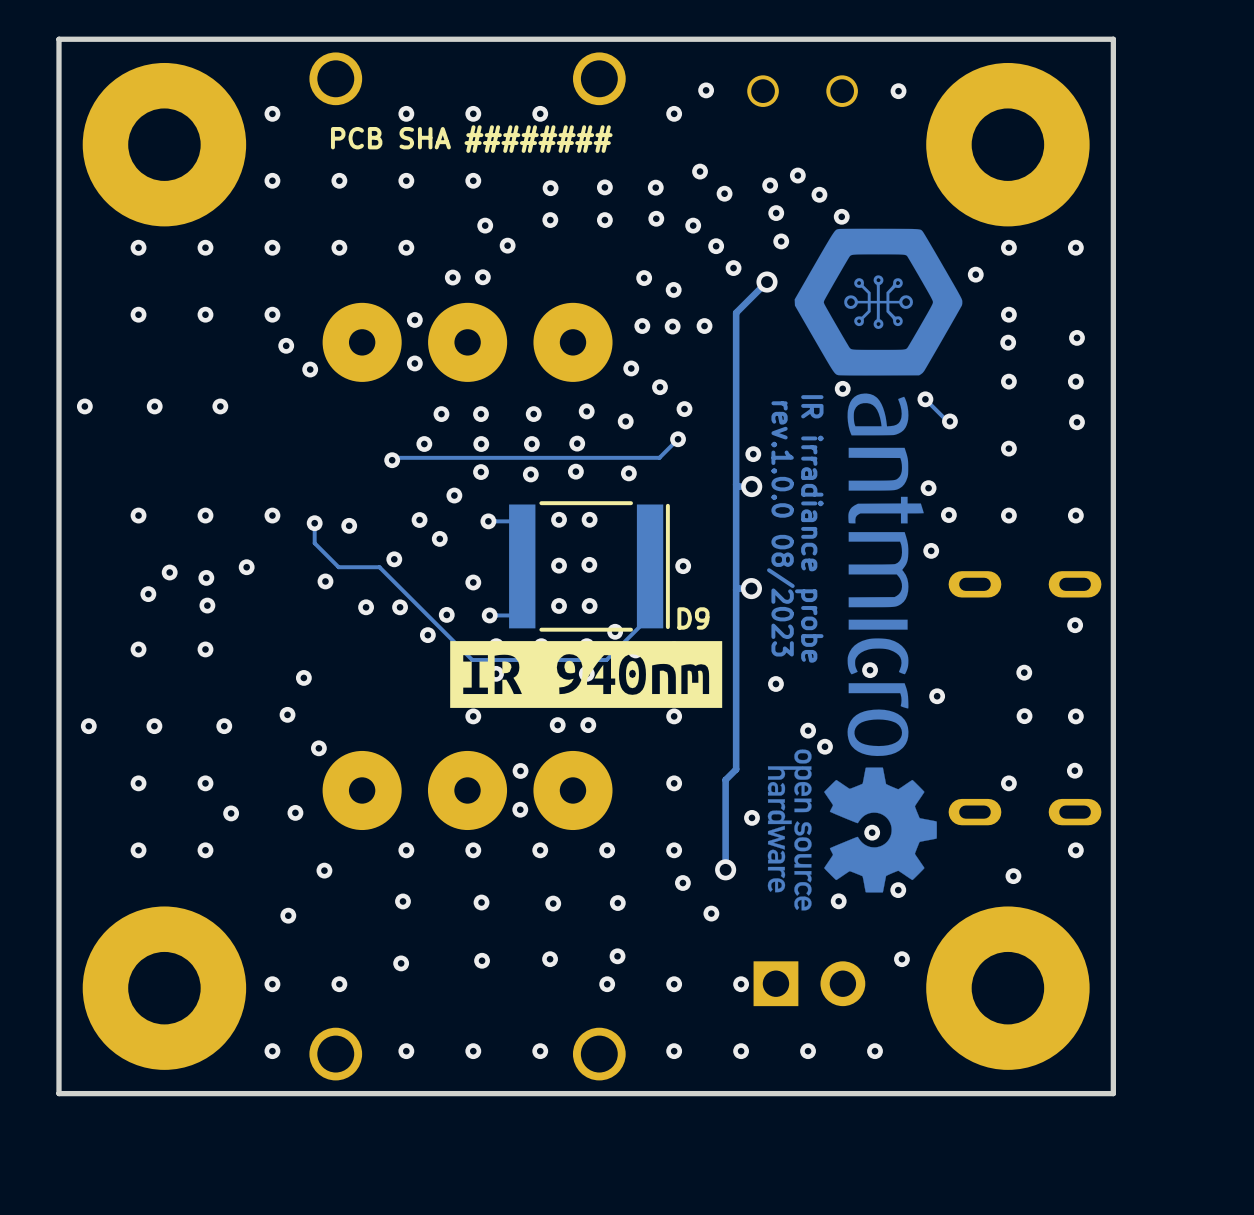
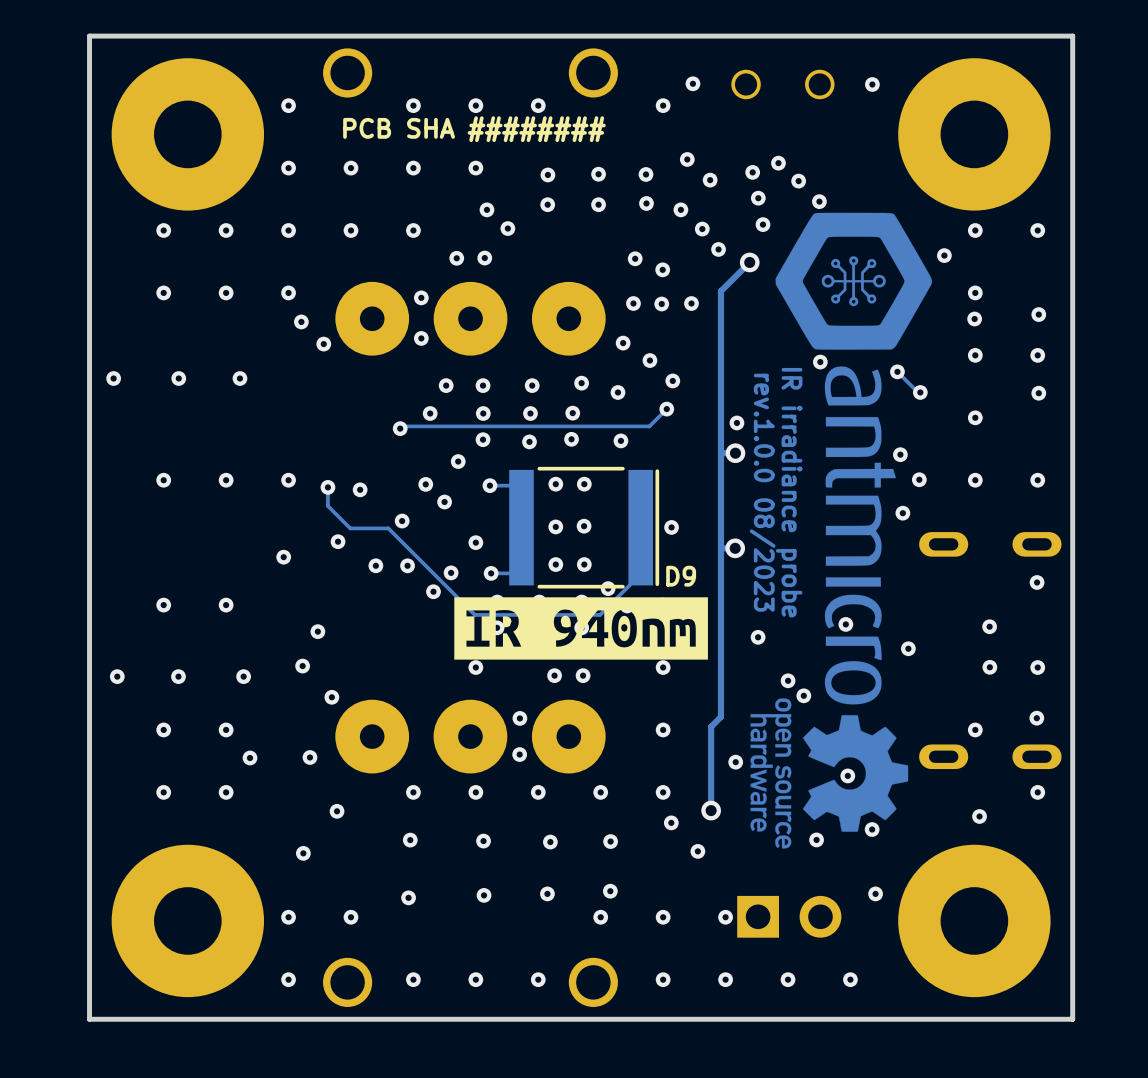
via: (246, 567) -> none
via: (169, 572) -> none
via: (206, 577) -> none
via: (148, 594) -> none
via: none -> (283, 557)
via: (207, 605) -> none

